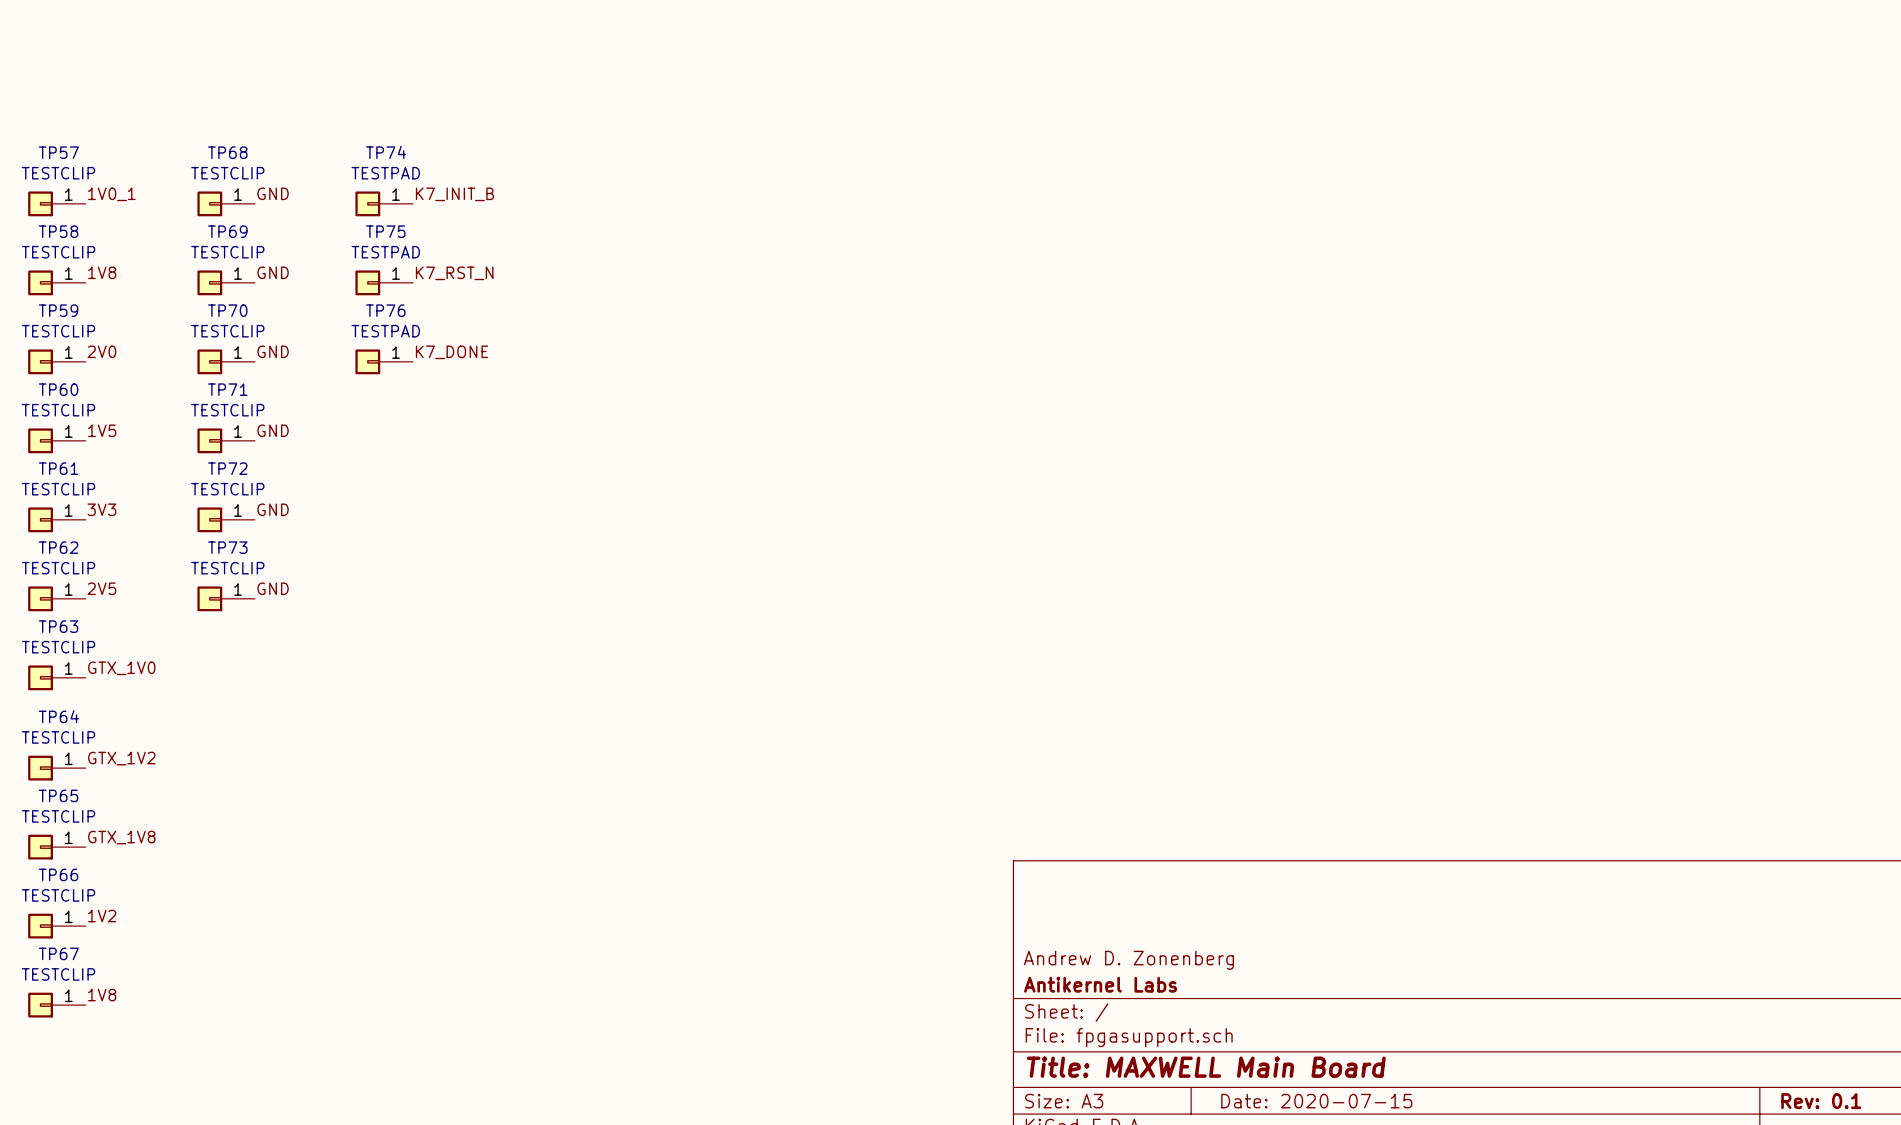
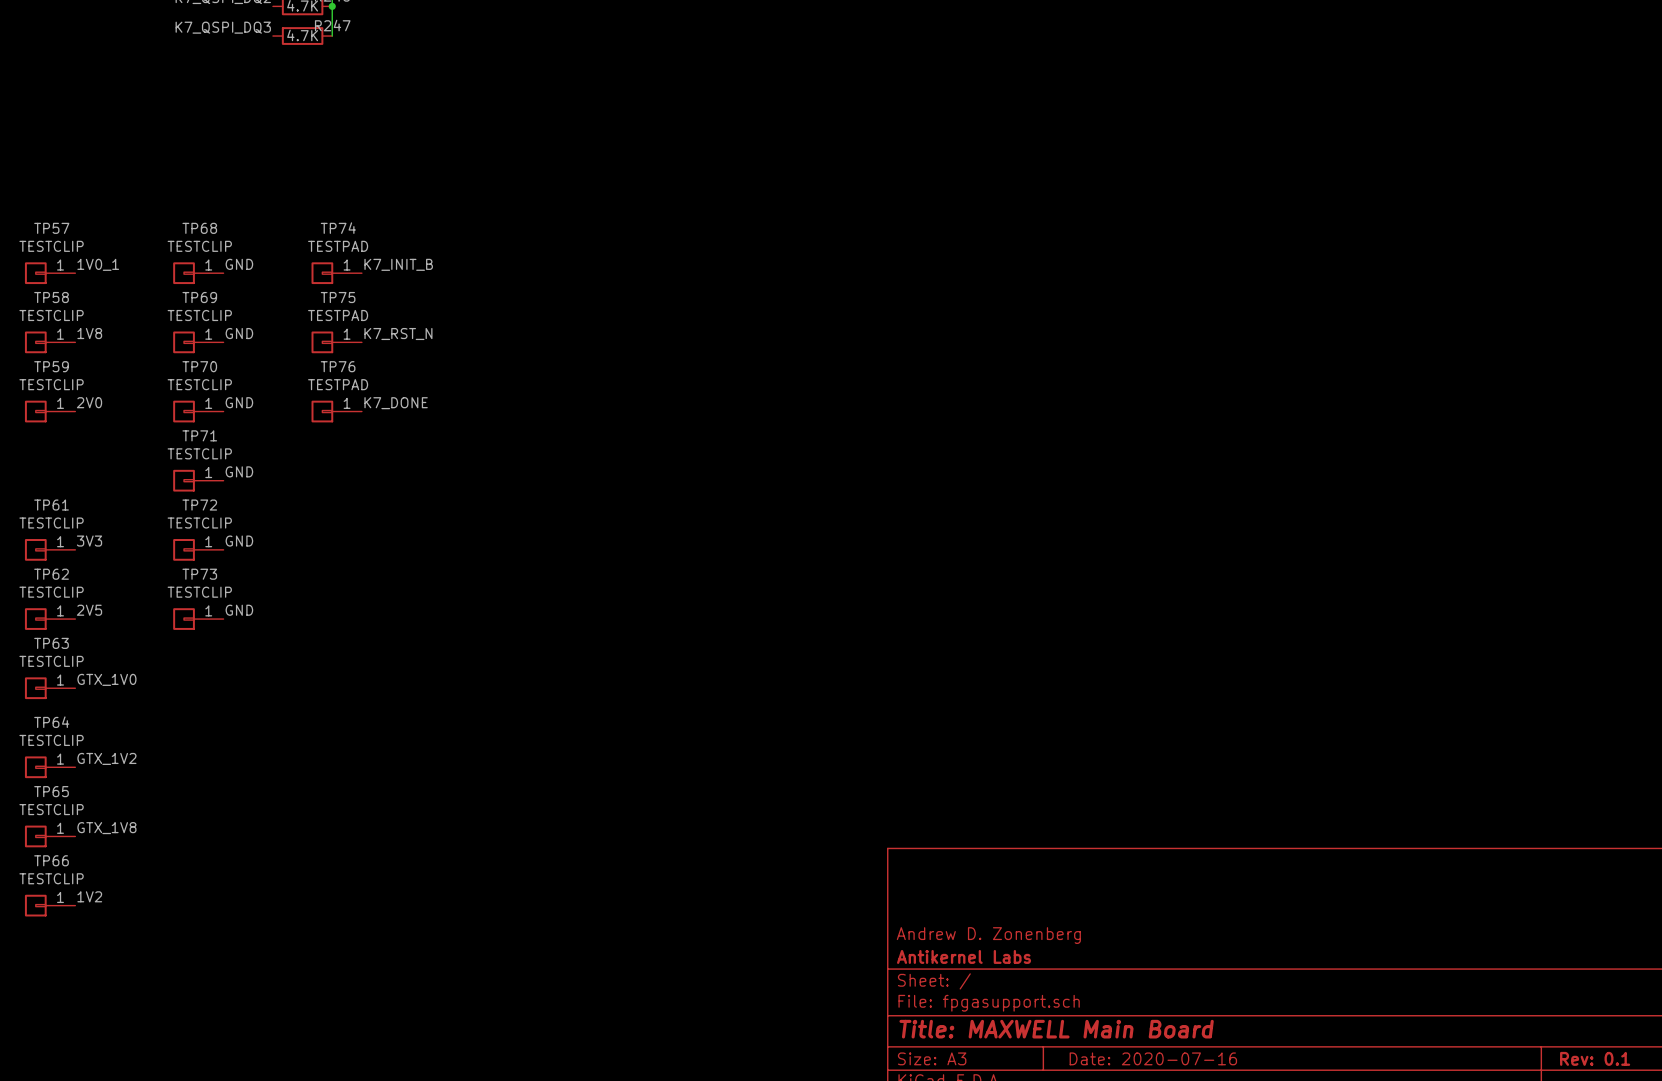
label: 1V5 (102, 430) -> none
TP60: TESTCLIP (56, 440) -> none
label: 1V8 (102, 995) -> none
TP67: TESTCLIP (56, 1005) -> none
title block: Date: 2020-07-15 (1316, 1101) -> Date: 2020-07-16 (1153, 1058)

